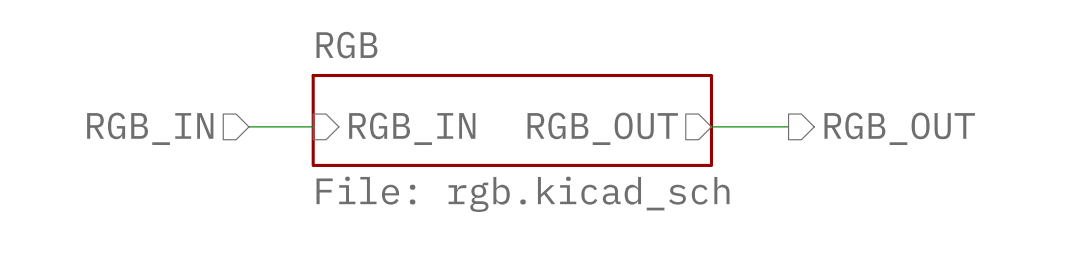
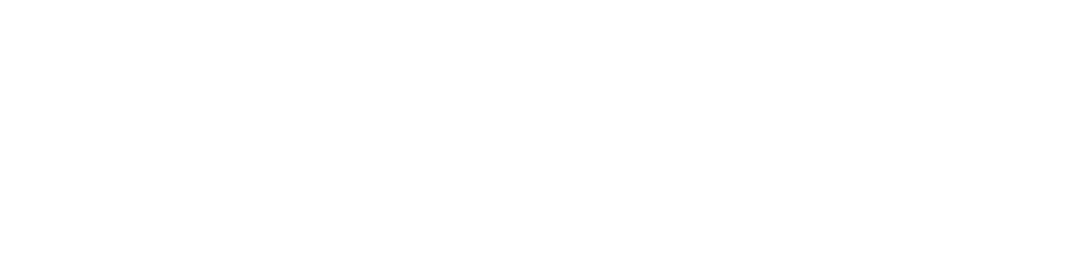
sheet RGB: File: rgb.kicad_sch (512, 120) -> none
wire: (248, 126) (313, 126) -> none
wire: (711, 126) (788, 126) -> none
hierarchical label: RGB_IN (150, 128) -> none
sheet pin: RGB_IN (412, 128) -> none
sheet pin: RGB_OUT (602, 128) -> none
hierarchical label: RGB_OUT (899, 128) -> none

